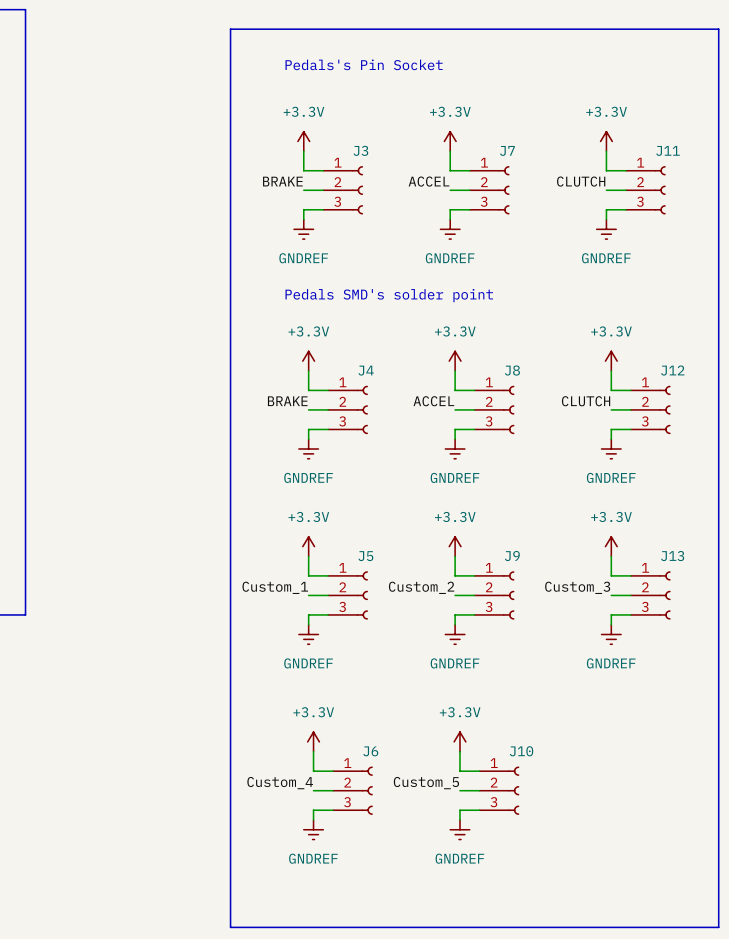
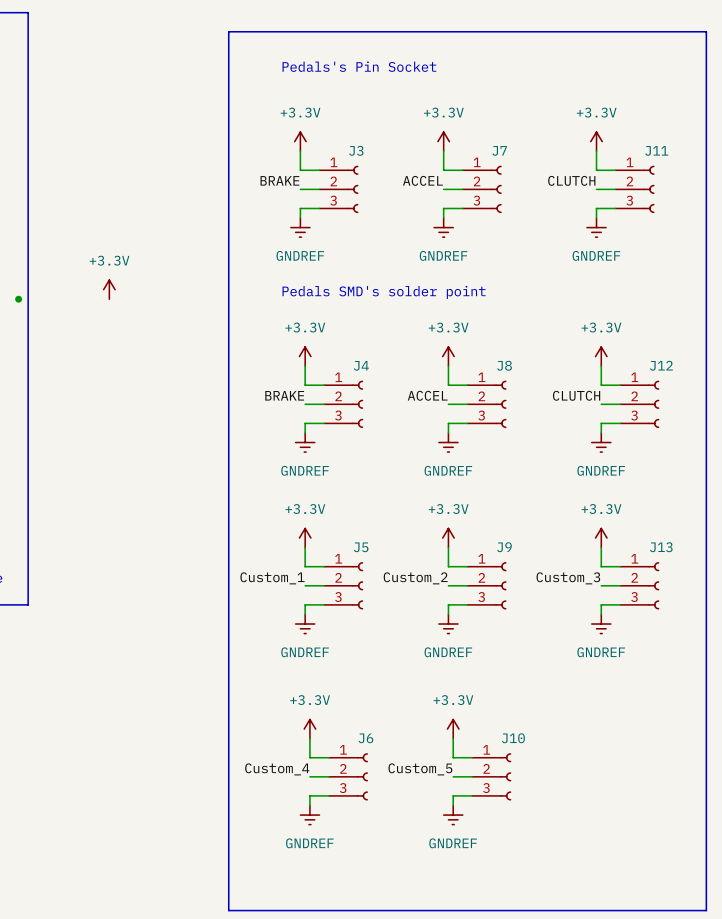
power symbol: none -> +3.3V (109, 289)
junction: none -> (18, 299)

